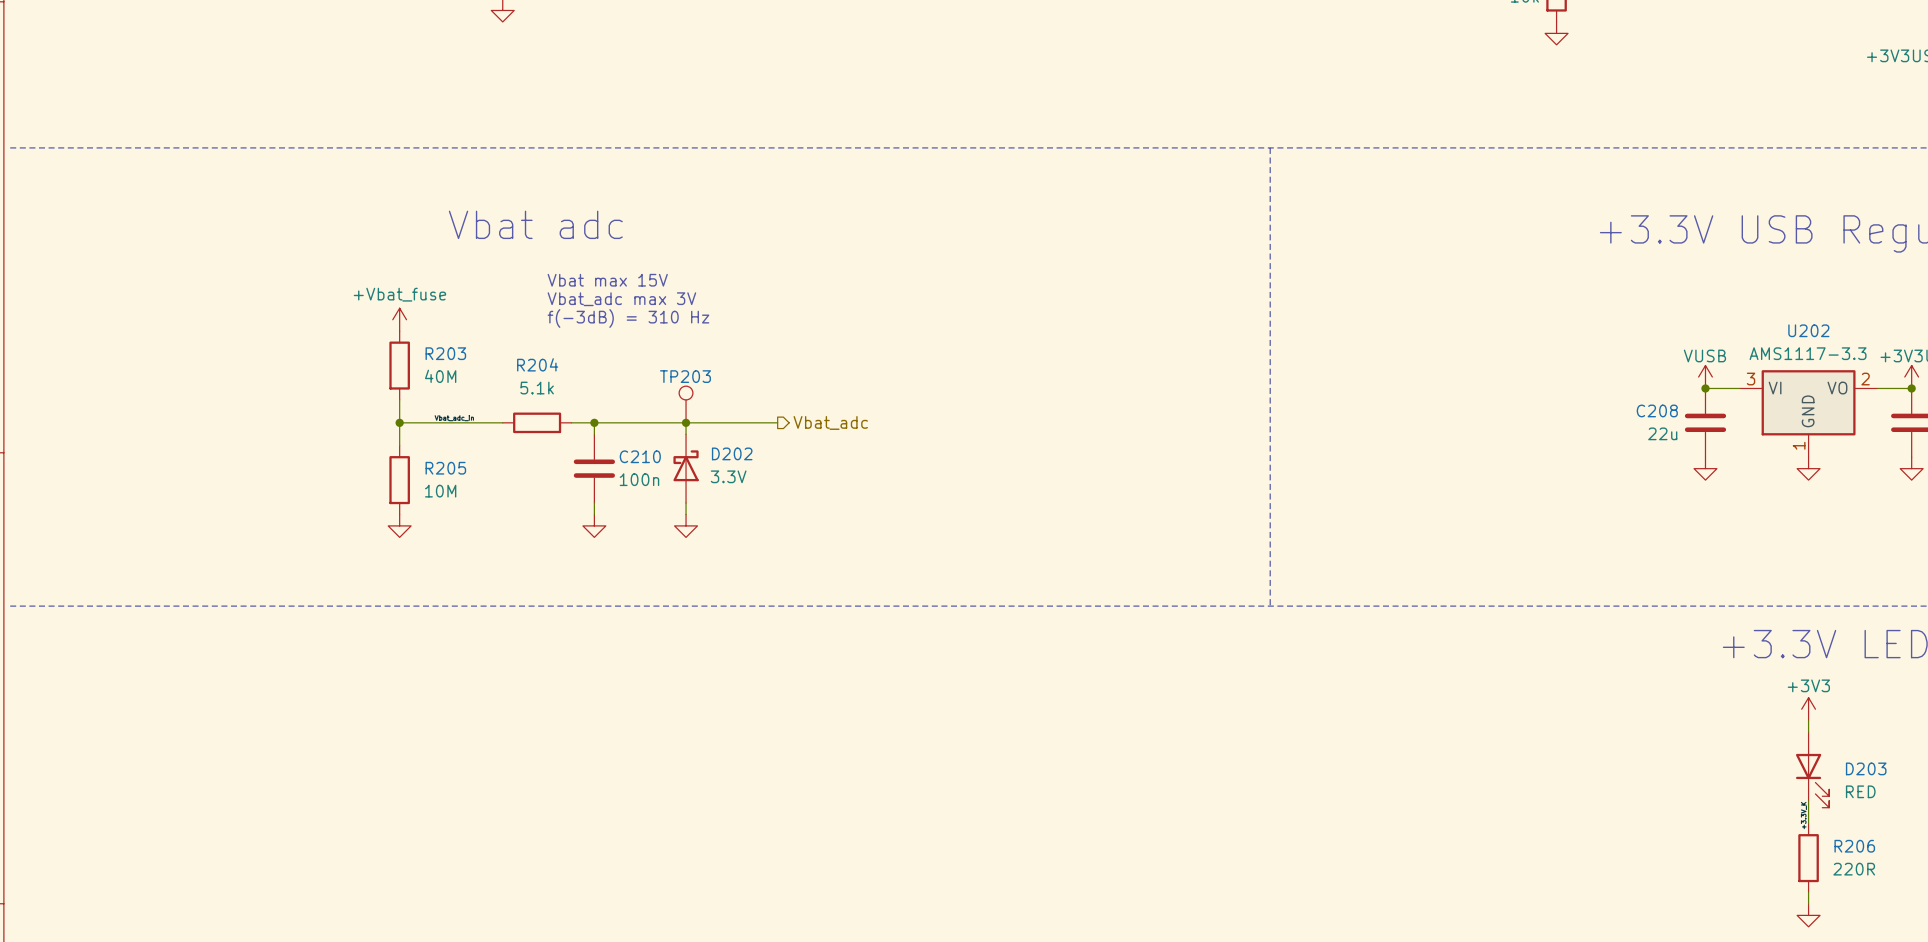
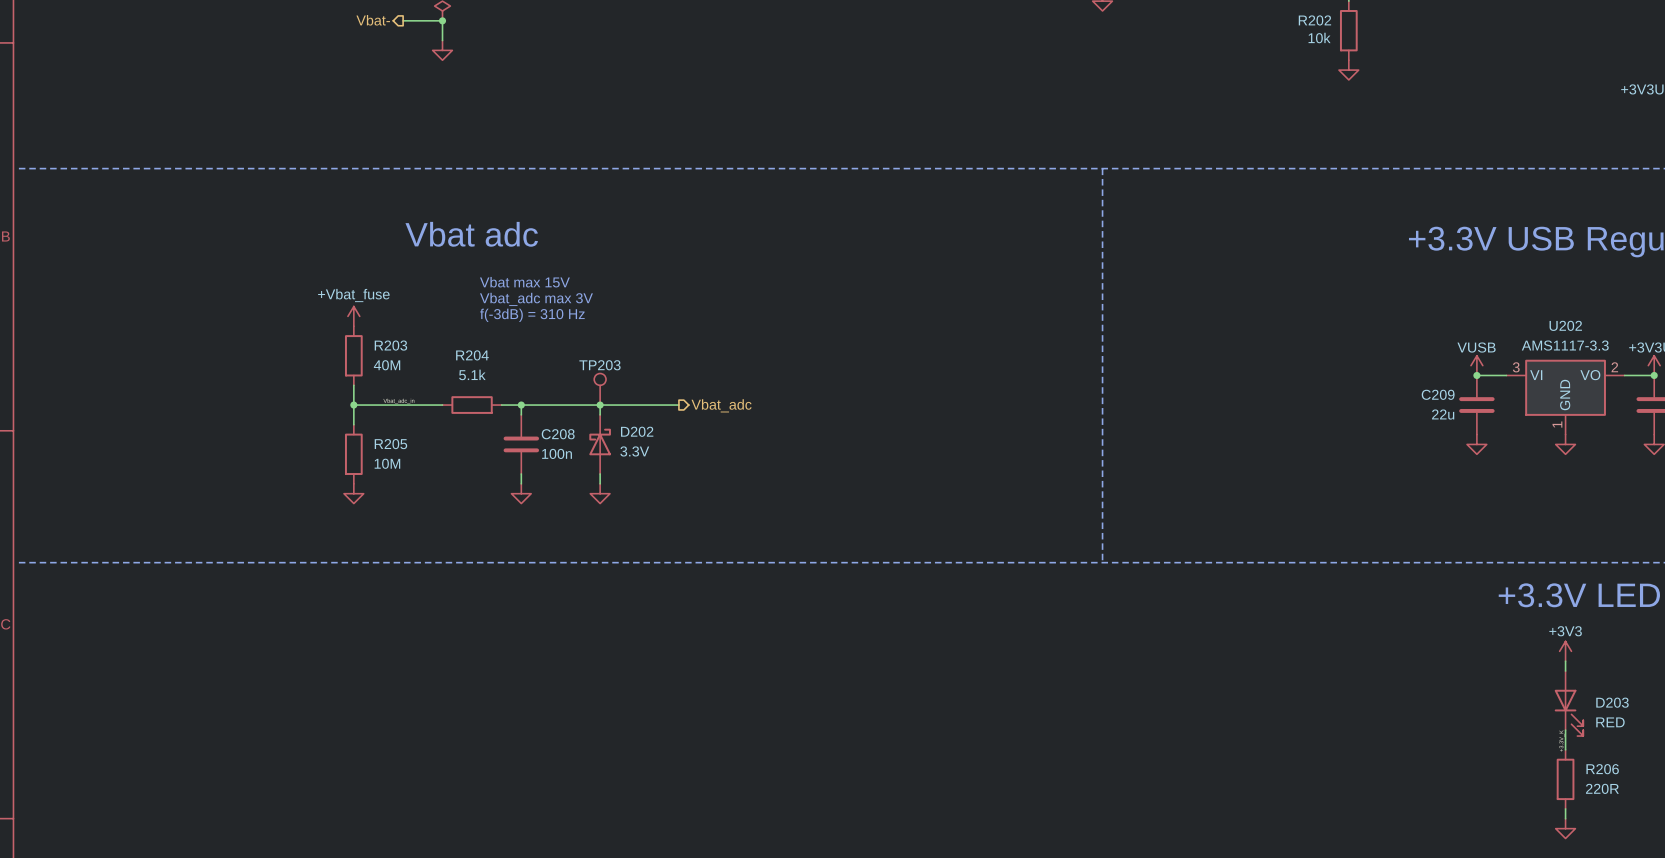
C208 name: C208 (1657, 410) -> C209 (1438, 394)
C210 name: C210 (640, 456) -> C208 (558, 434)

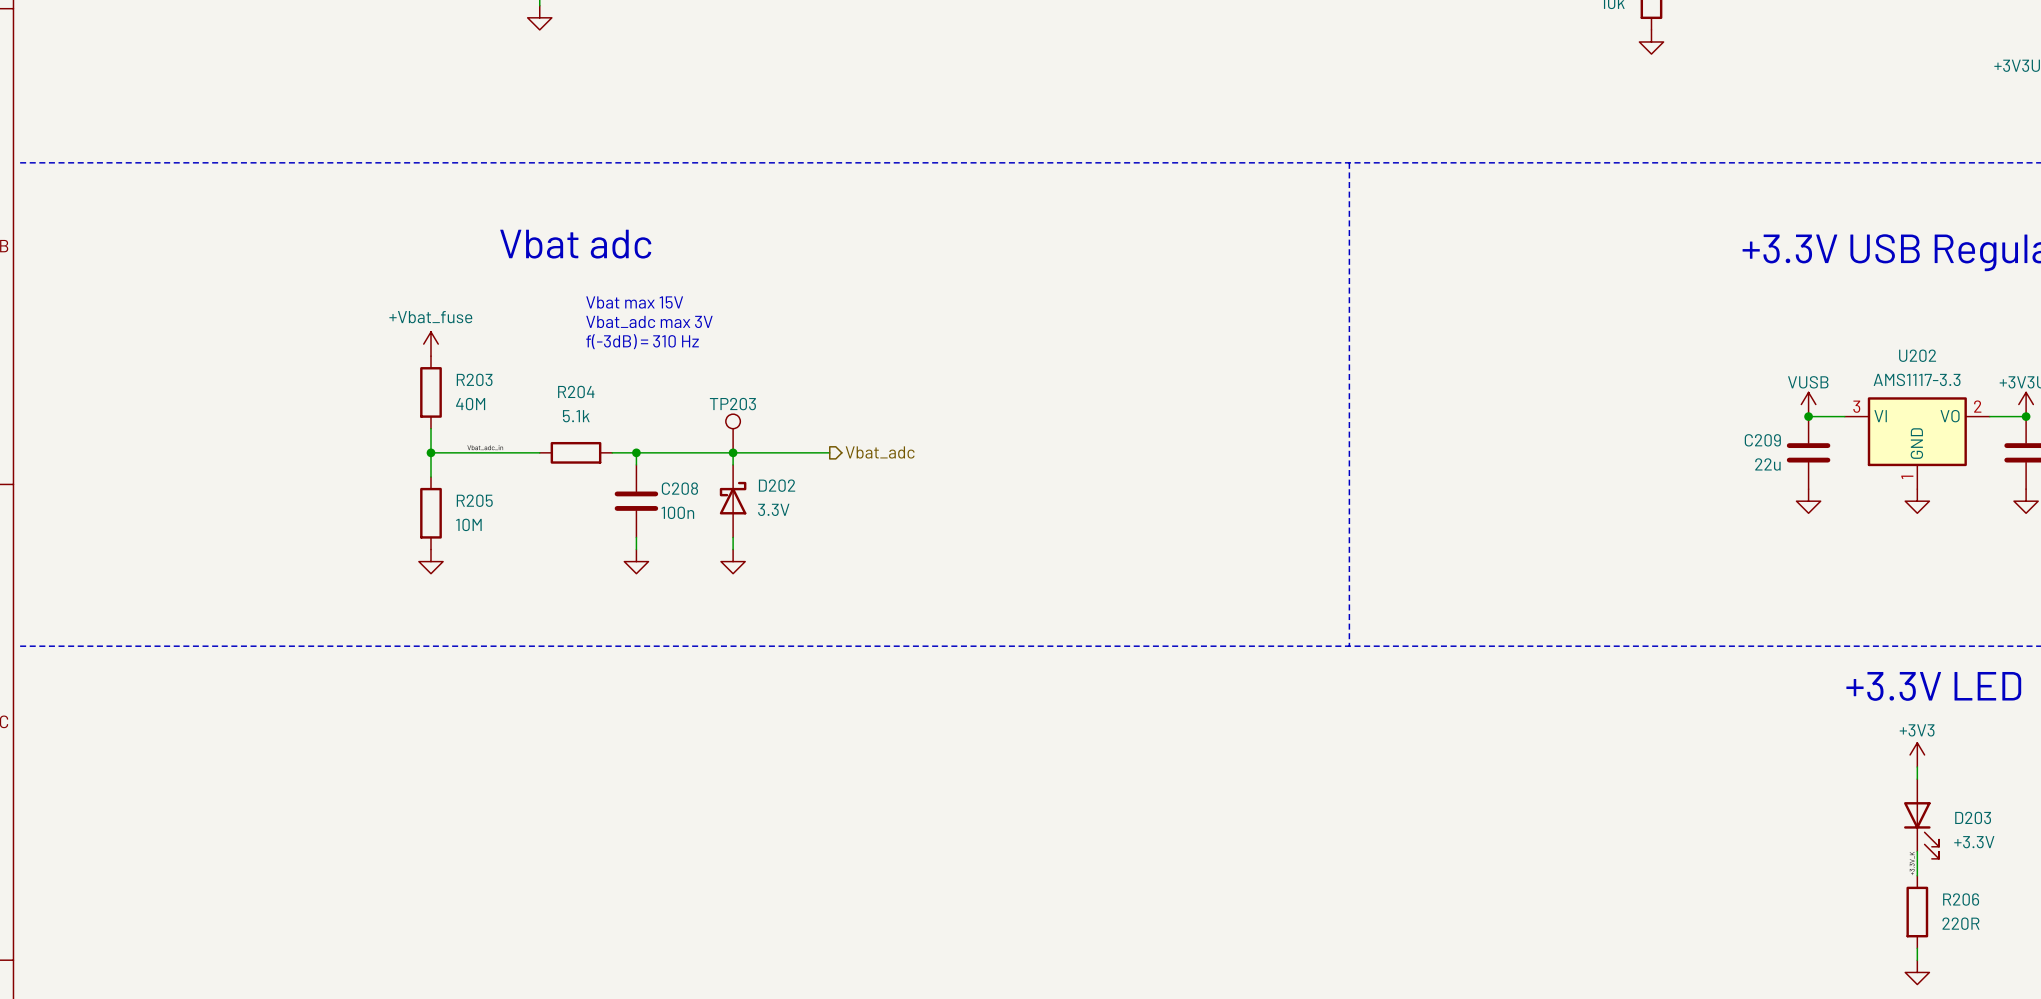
D203 value: RED (1610, 722) -> +3.3V (1974, 842)

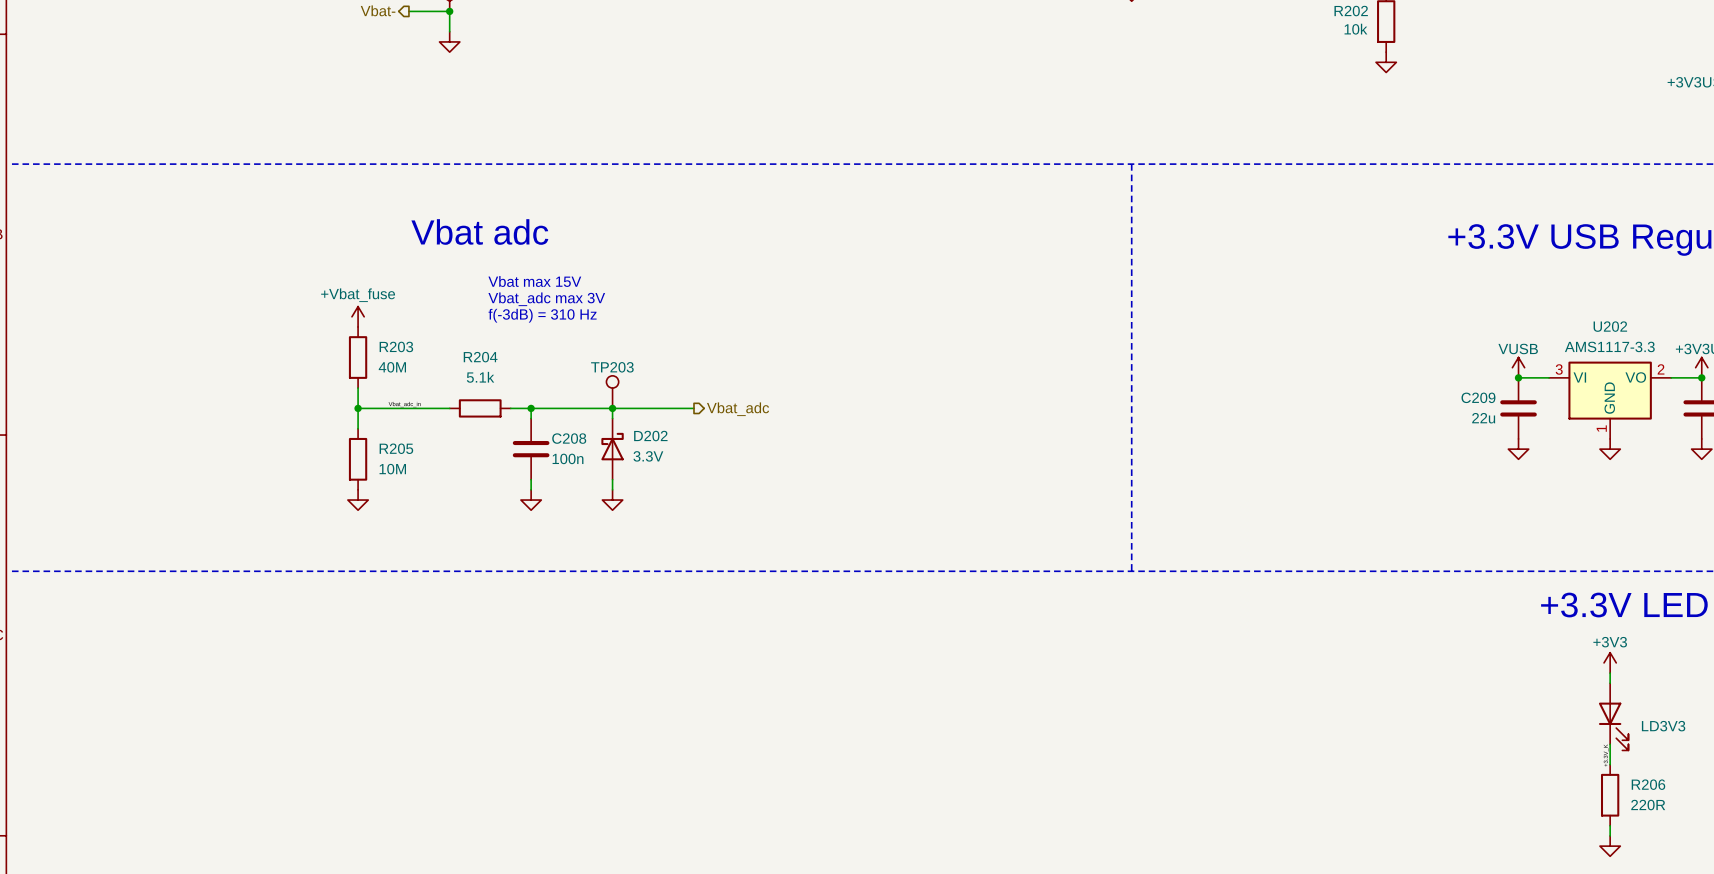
D203 name: D203 (1973, 817) -> LD3V3 (1663, 726)
D203 value: +3.3V (1974, 842) -> none

